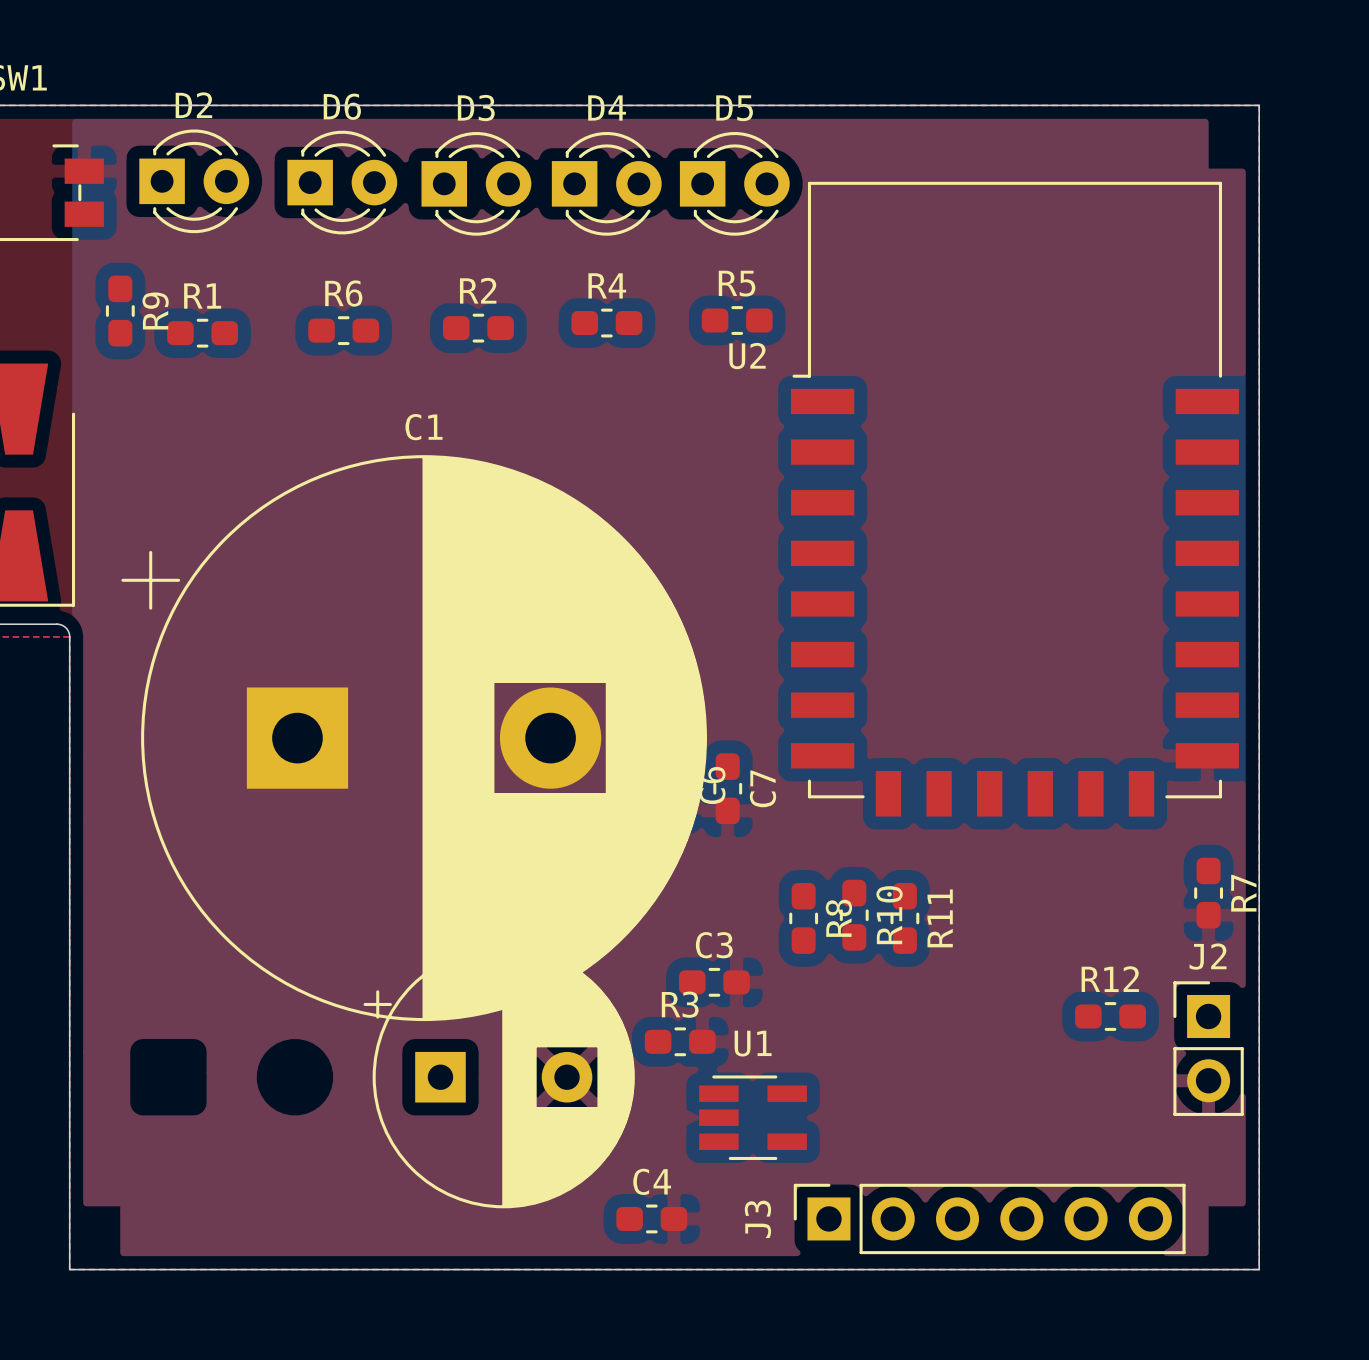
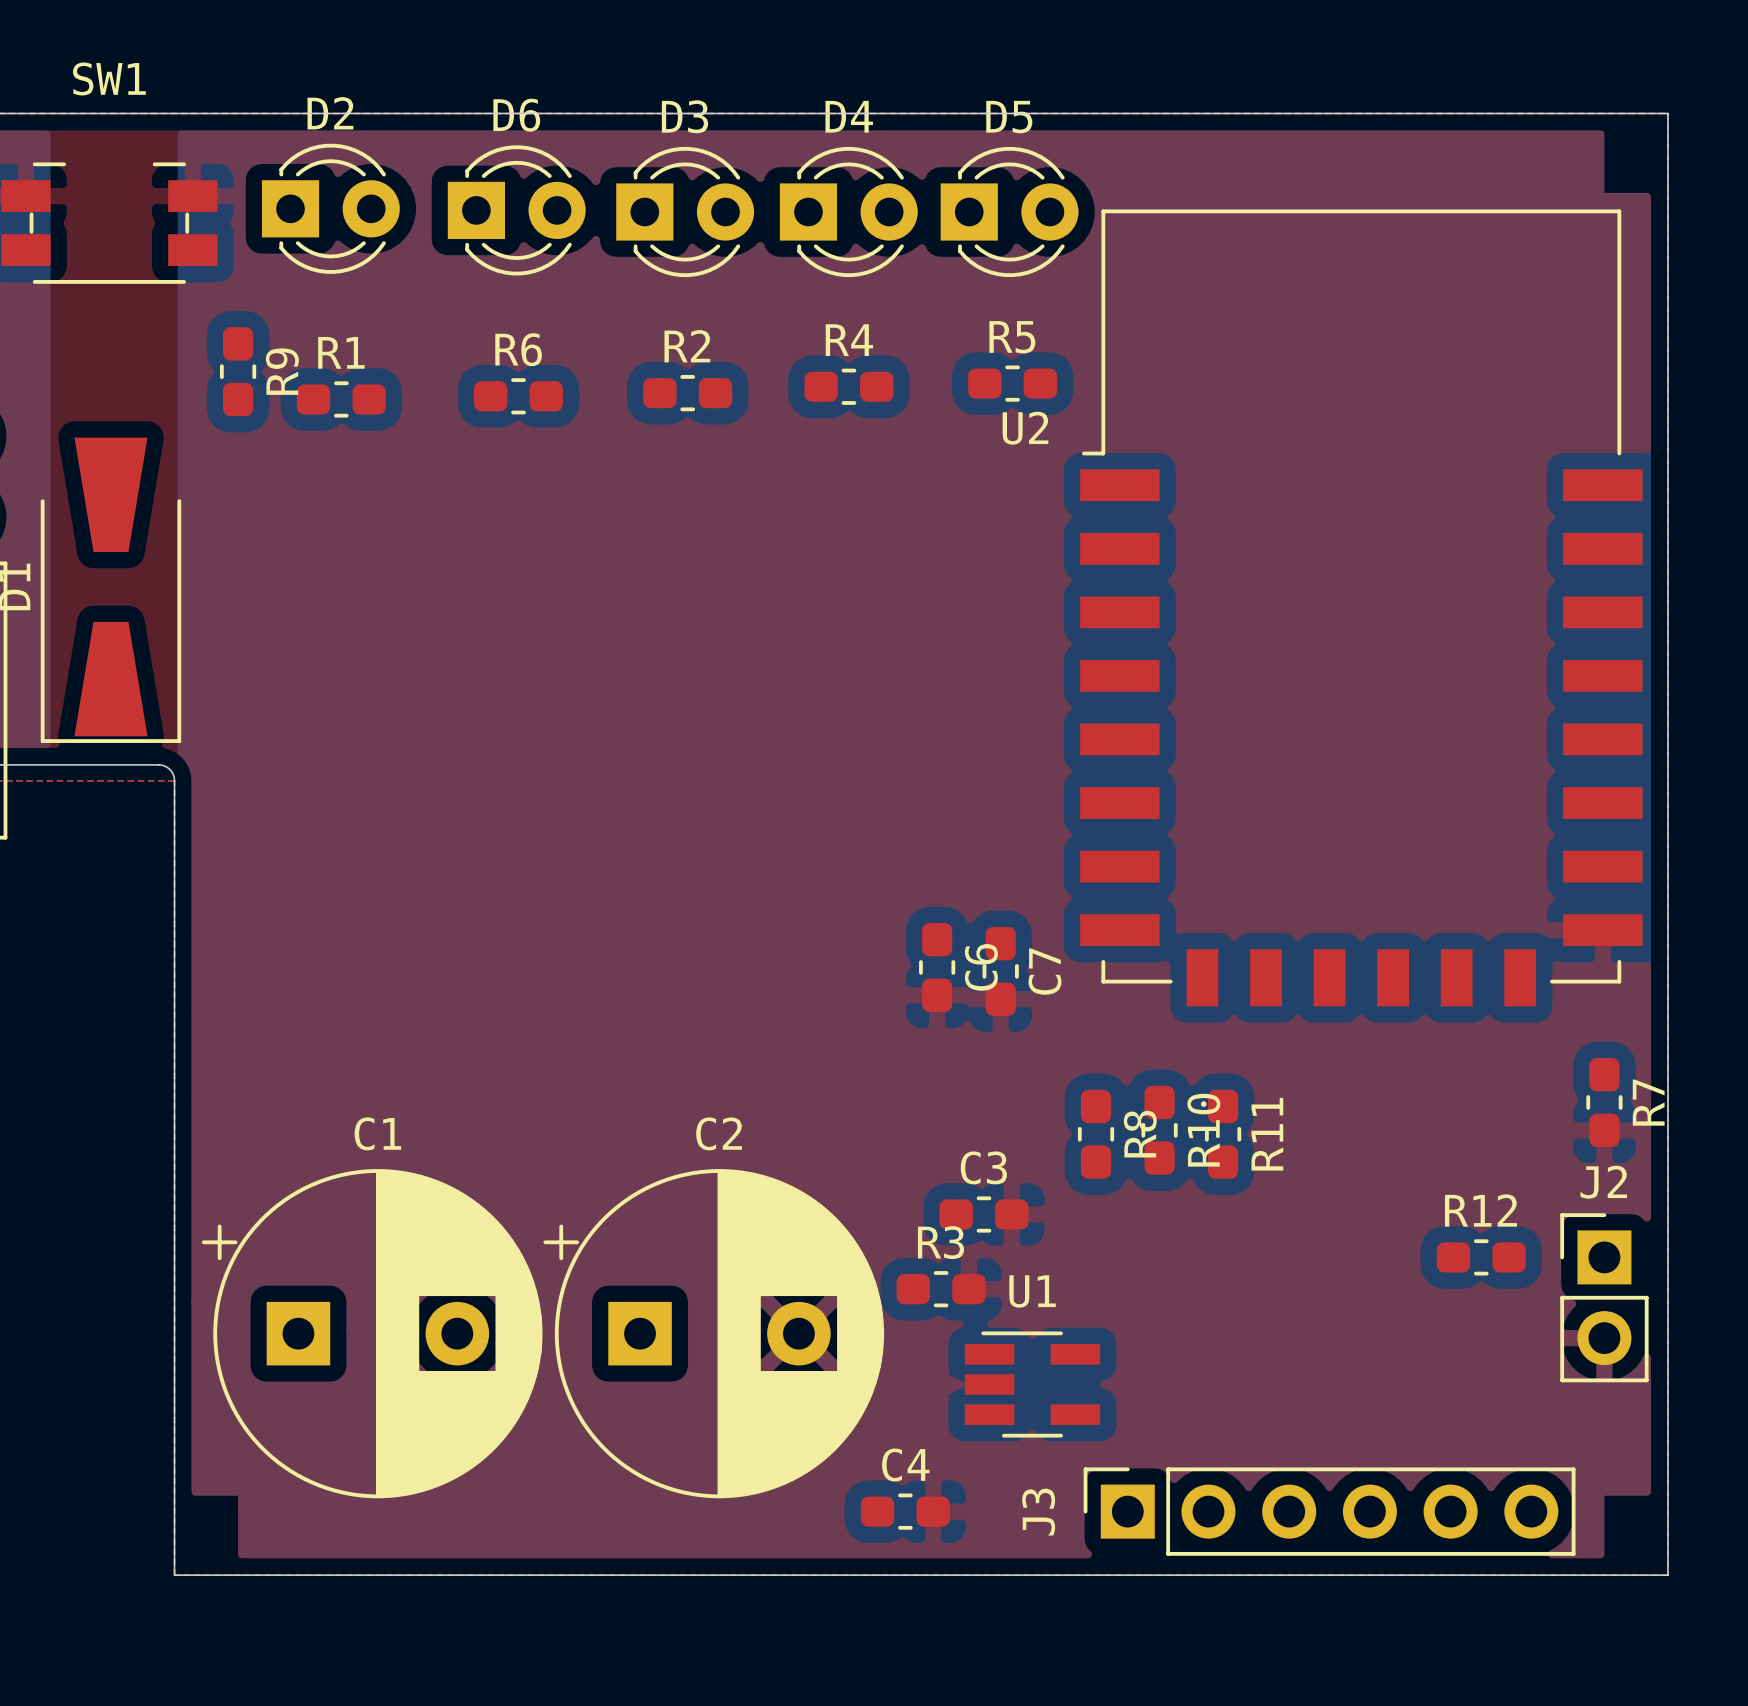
C1 name position: C1 (424, 427) -> C1 (377, 1133)
C1 footprint: [121, 455, 707, 1022] -> [201, 1169, 543, 1499]

